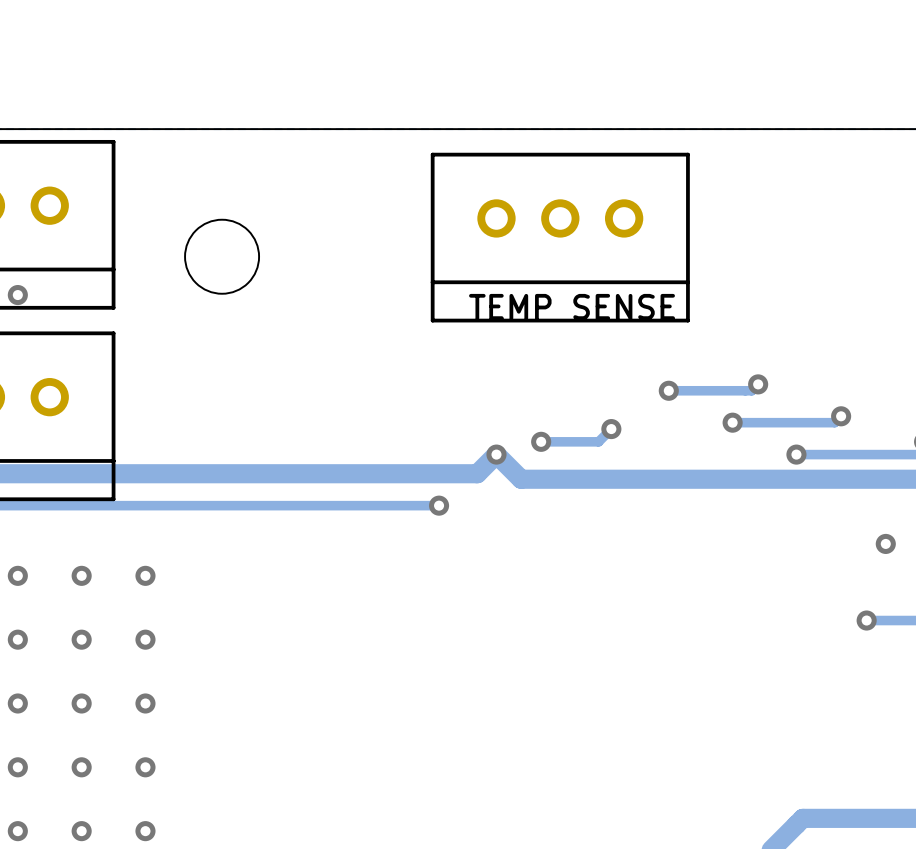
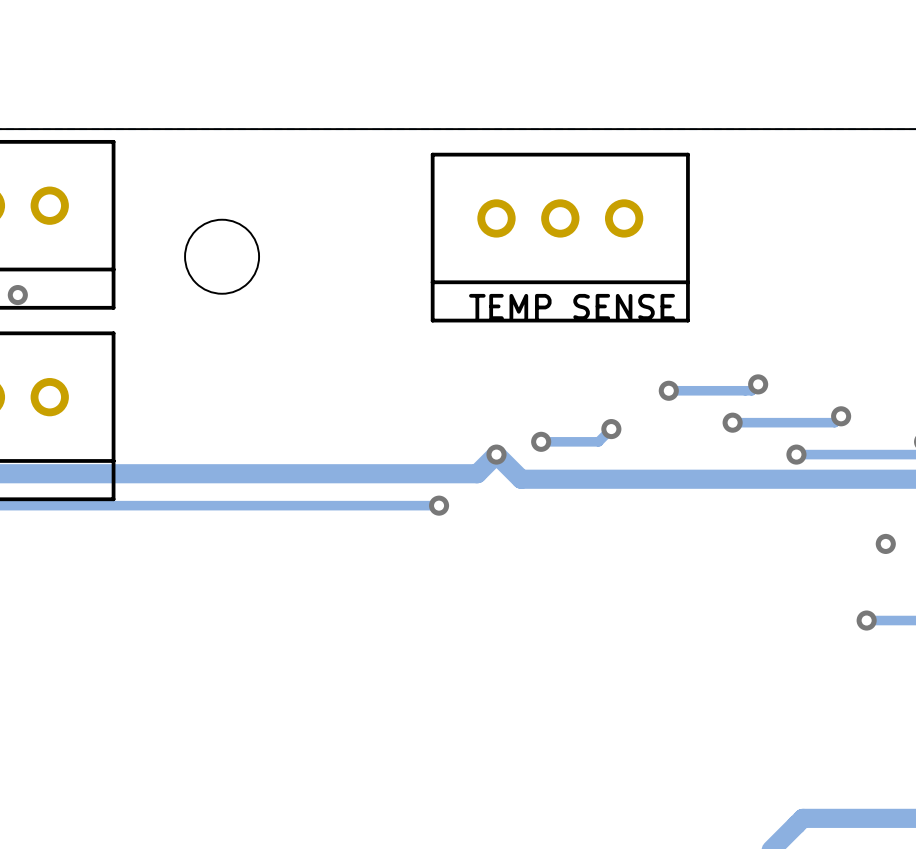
via: (17, 575) -> none
via: (81, 575) -> none
via: (145, 575) -> none
via: (17, 639) -> none
via: (81, 639) -> none
via: (145, 639) -> none
via: (17, 703) -> none
via: (81, 703) -> none
via: (145, 703) -> none
via: (17, 767) -> none
via: (81, 767) -> none
via: (145, 767) -> none
via: (17, 831) -> none
via: (81, 831) -> none
via: (145, 831) -> none

